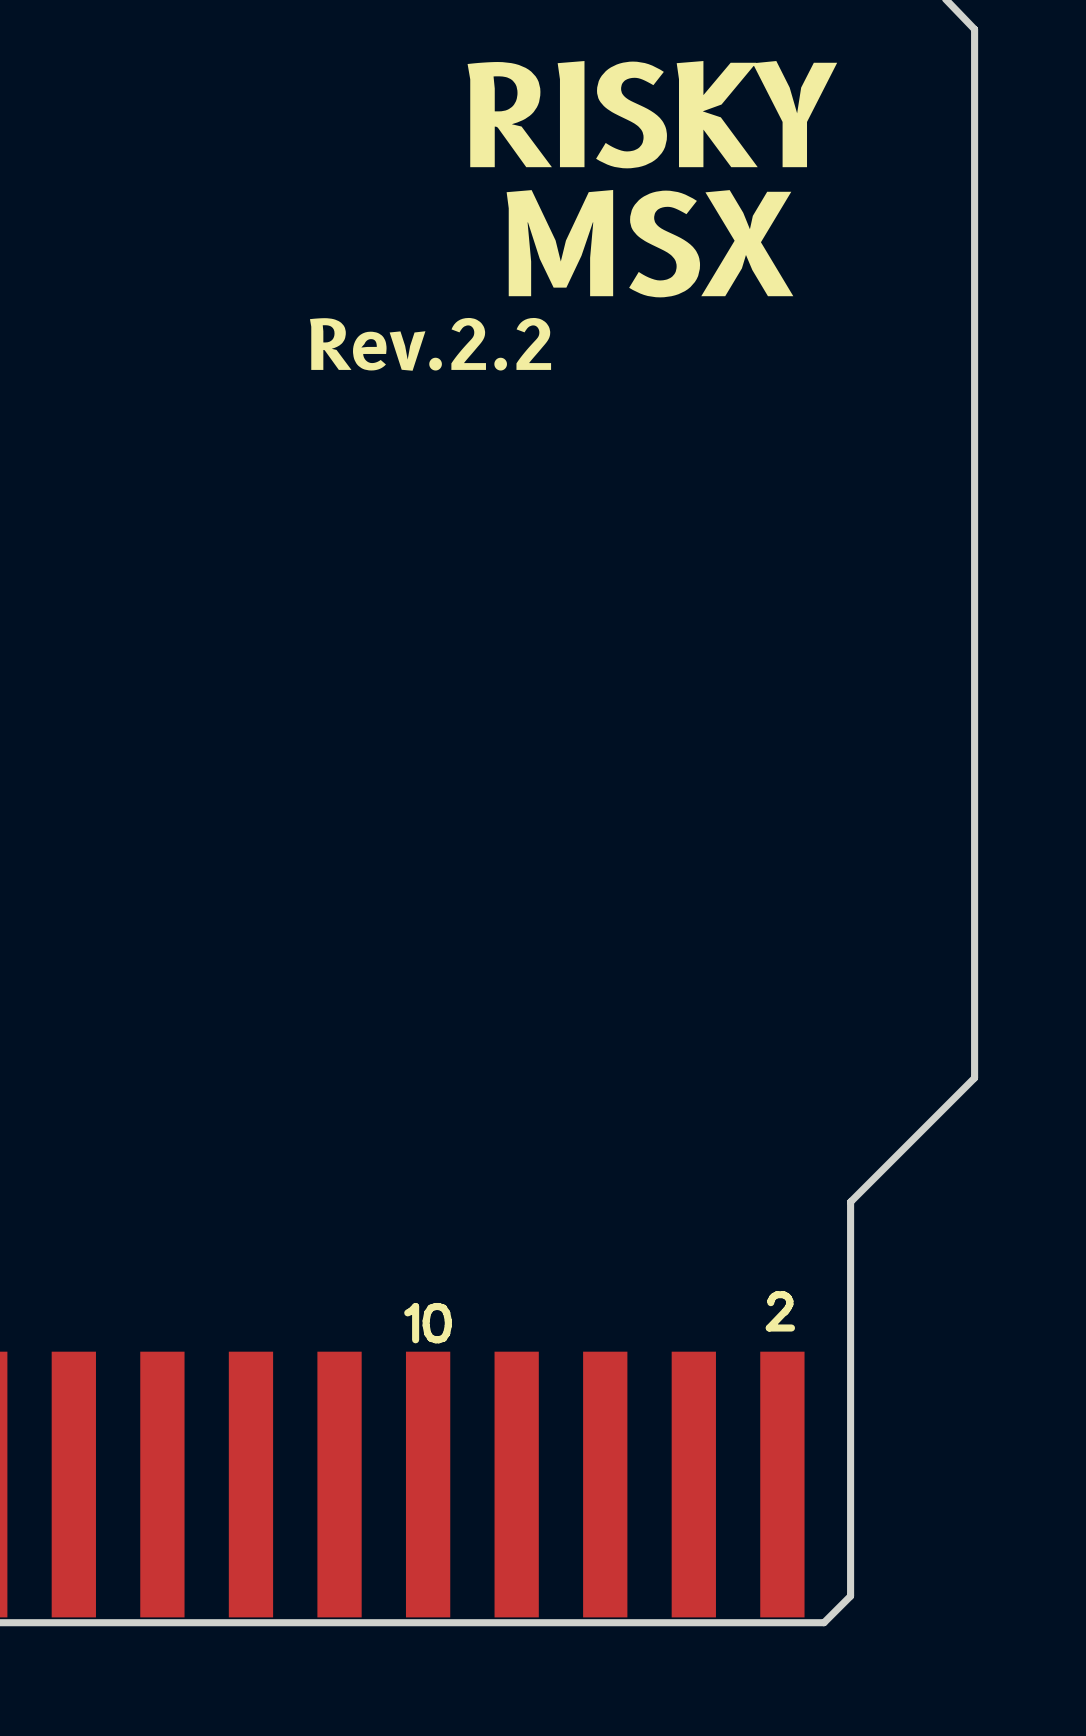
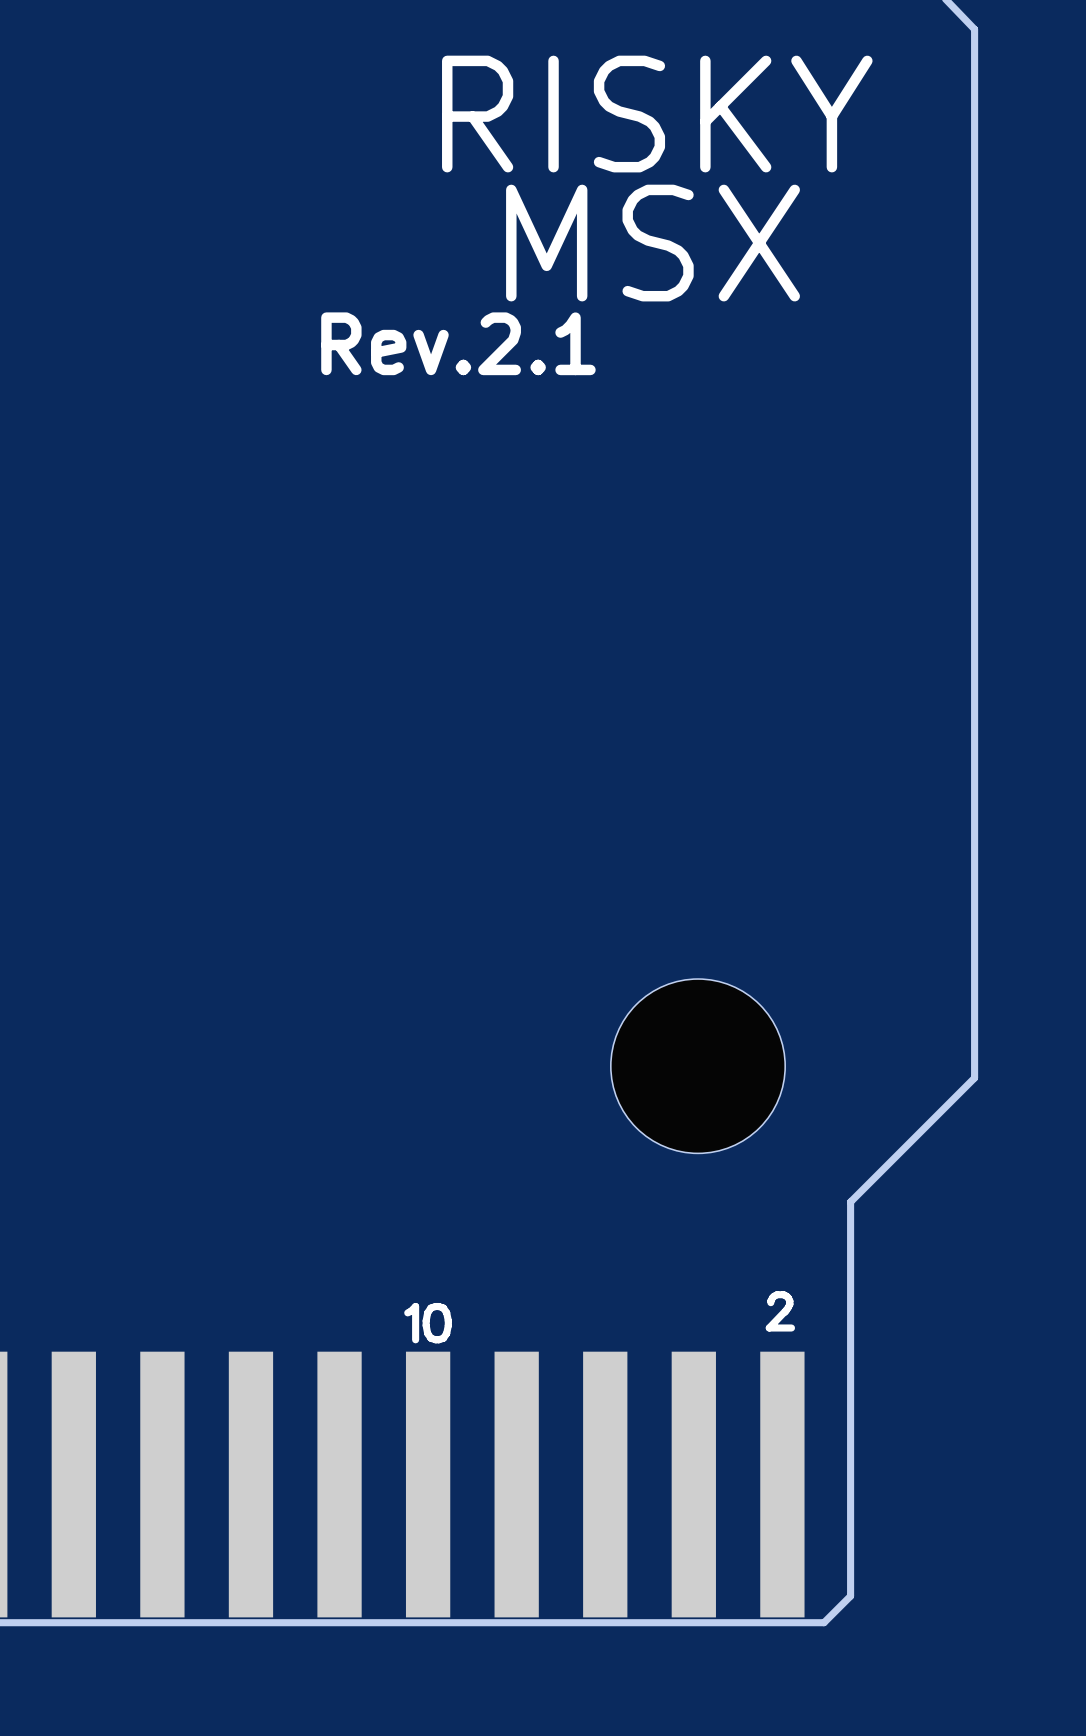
text: Rev.2.2 (430, 344) -> Rev.2.1 (458, 343)
part: none -> (698, 1066)

